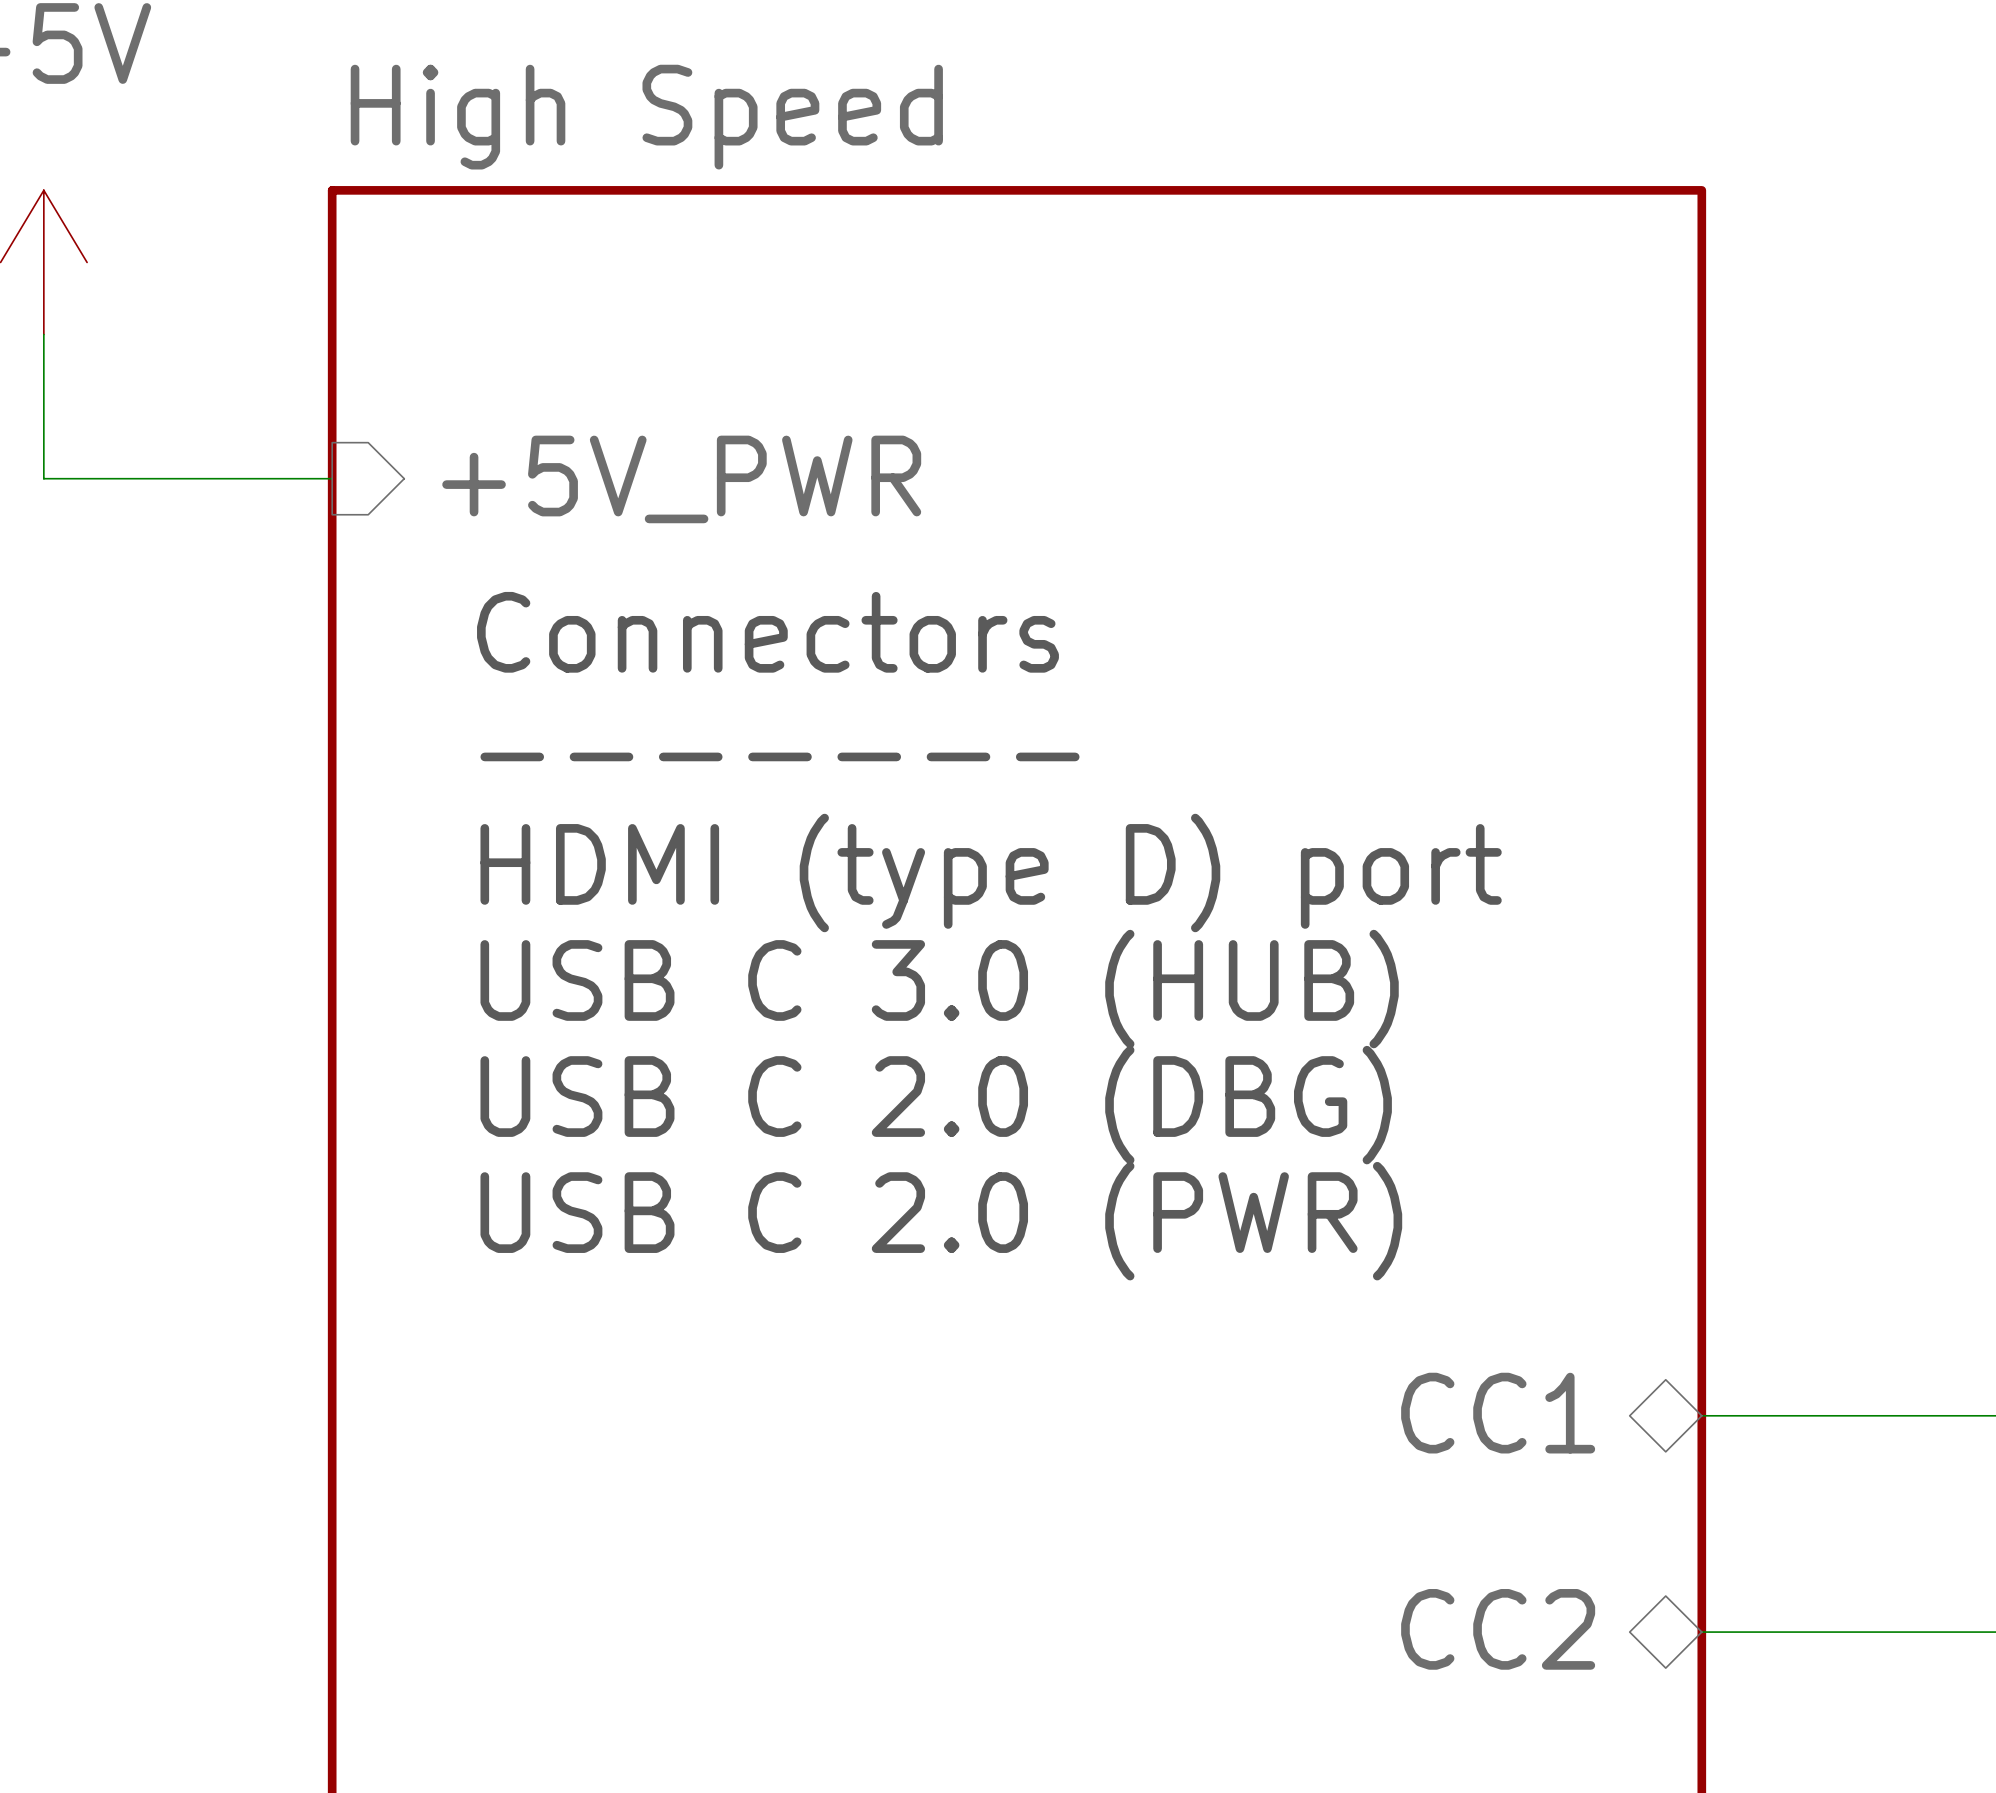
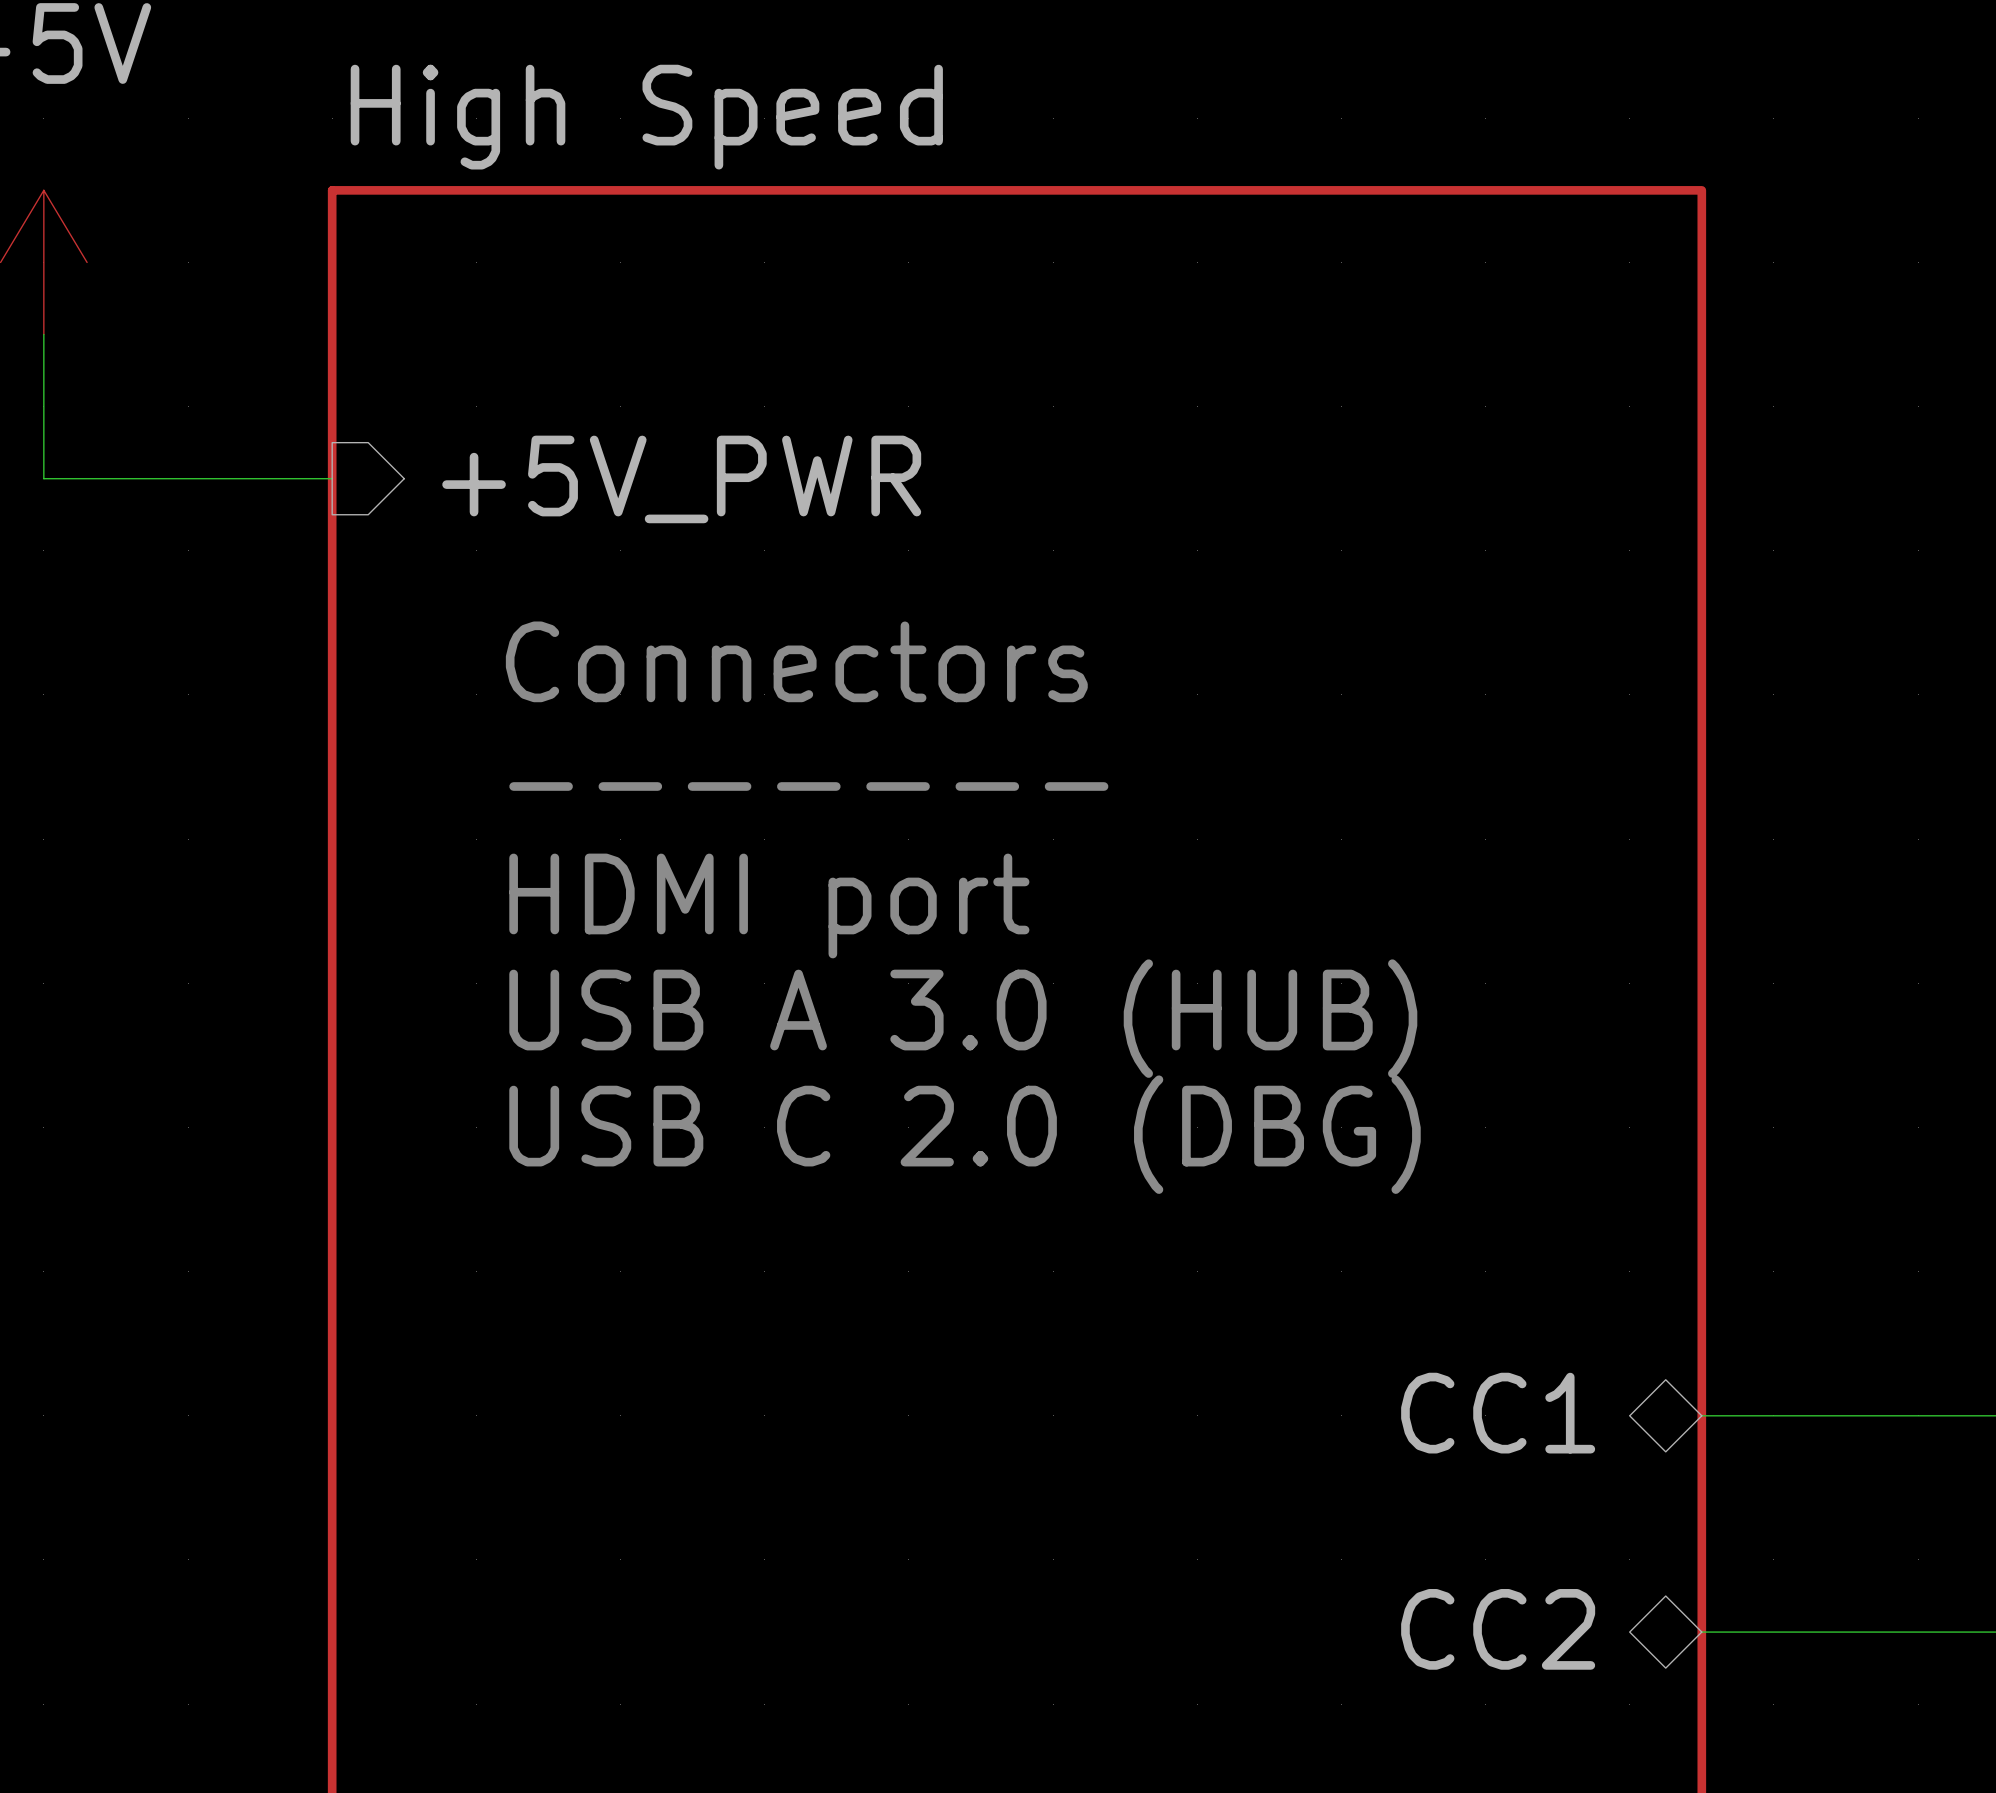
text position: Connectors (767, 632) -> Connectors (796, 661)
text position: ------- (779, 756) -> ------- (808, 786)
text: HDMI (type D) port (991, 872) -> HDMI port (769, 905)
text: USB C 3.0 (HUB) (939, 989) -> USB A 3.0 (HUB) (963, 1018)
text position: USB C 2.0 (DBG) (936, 1105) -> USB C 2.0 (DBG) (965, 1134)
text: USB C 2.0 (PWR) (941, 1221) -> none

